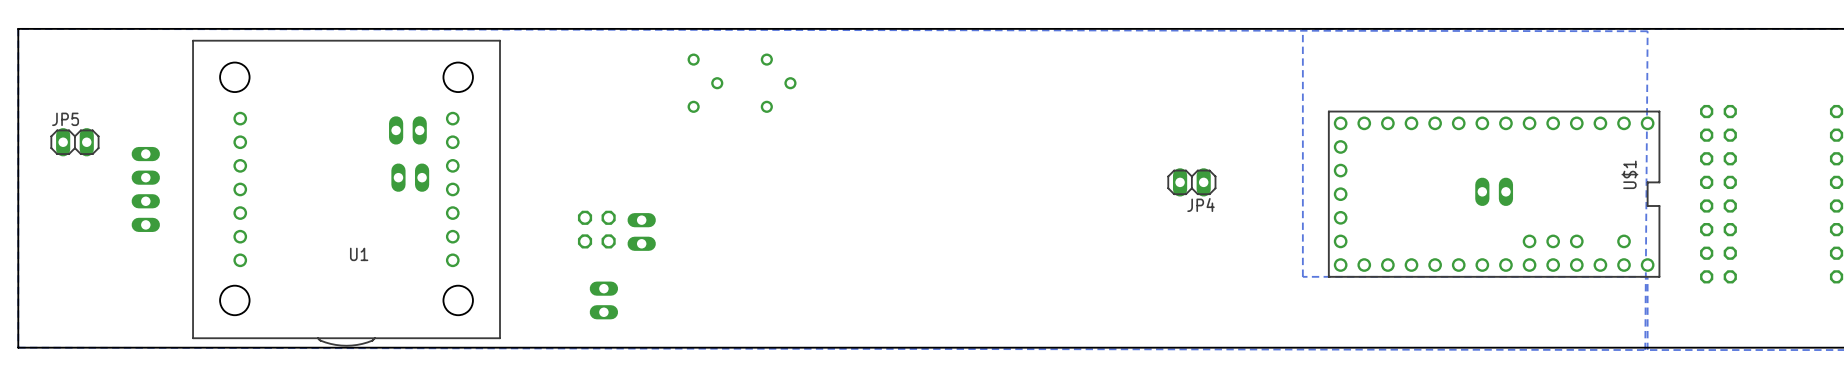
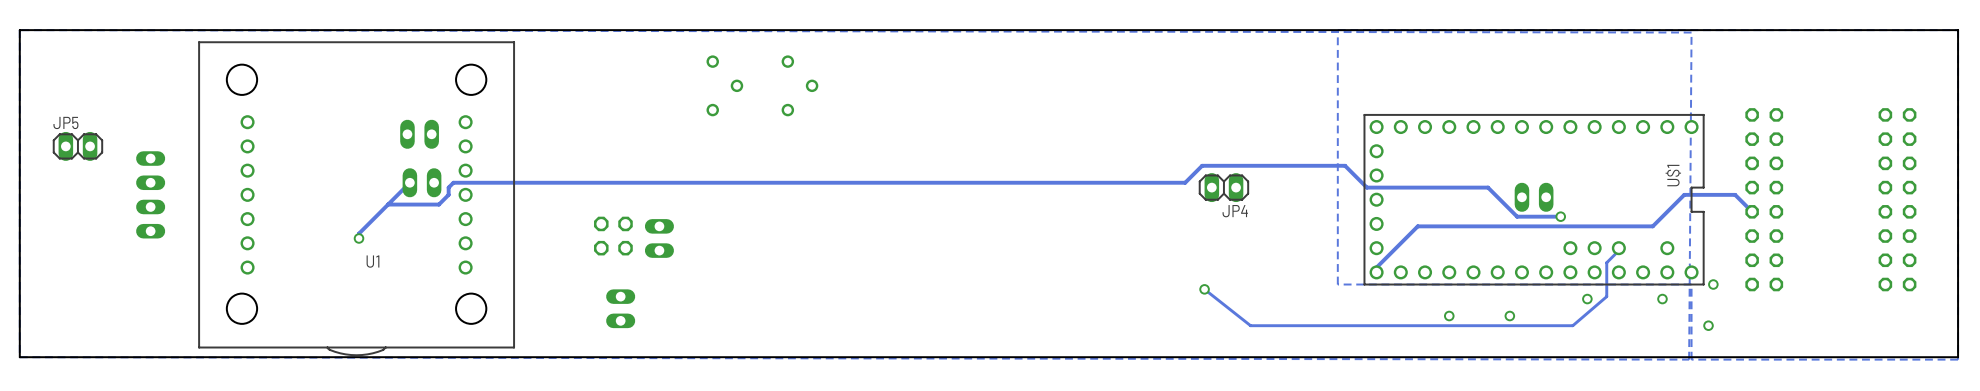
track: none -> (409, 182) (359, 233) (359, 238)
track: none -> (388, 204) (438, 204) (448, 194) (448, 187) (453, 182) (1185, 182) (1202, 165) (1345, 165) (1366, 187) (1488, 187) (1517, 216) (1560, 216)
track: none -> (1752, 211) (1735, 194) (1684, 194) (1652, 226) (1417, 226) (1376, 267) (1376, 272)
via: none -> (1560, 216)
via: none -> (359, 238)
track: none -> (1618, 248) (1618, 250) (1606, 262) (1606, 296) (1572, 325) (1250, 325) (1204, 289)
via: none -> (1713, 284)
via: none -> (1204, 289)
via: none -> (1587, 299)
via: none -> (1662, 299)
via: none -> (1449, 316)
via: none -> (1509, 316)
via: none -> (1708, 325)

